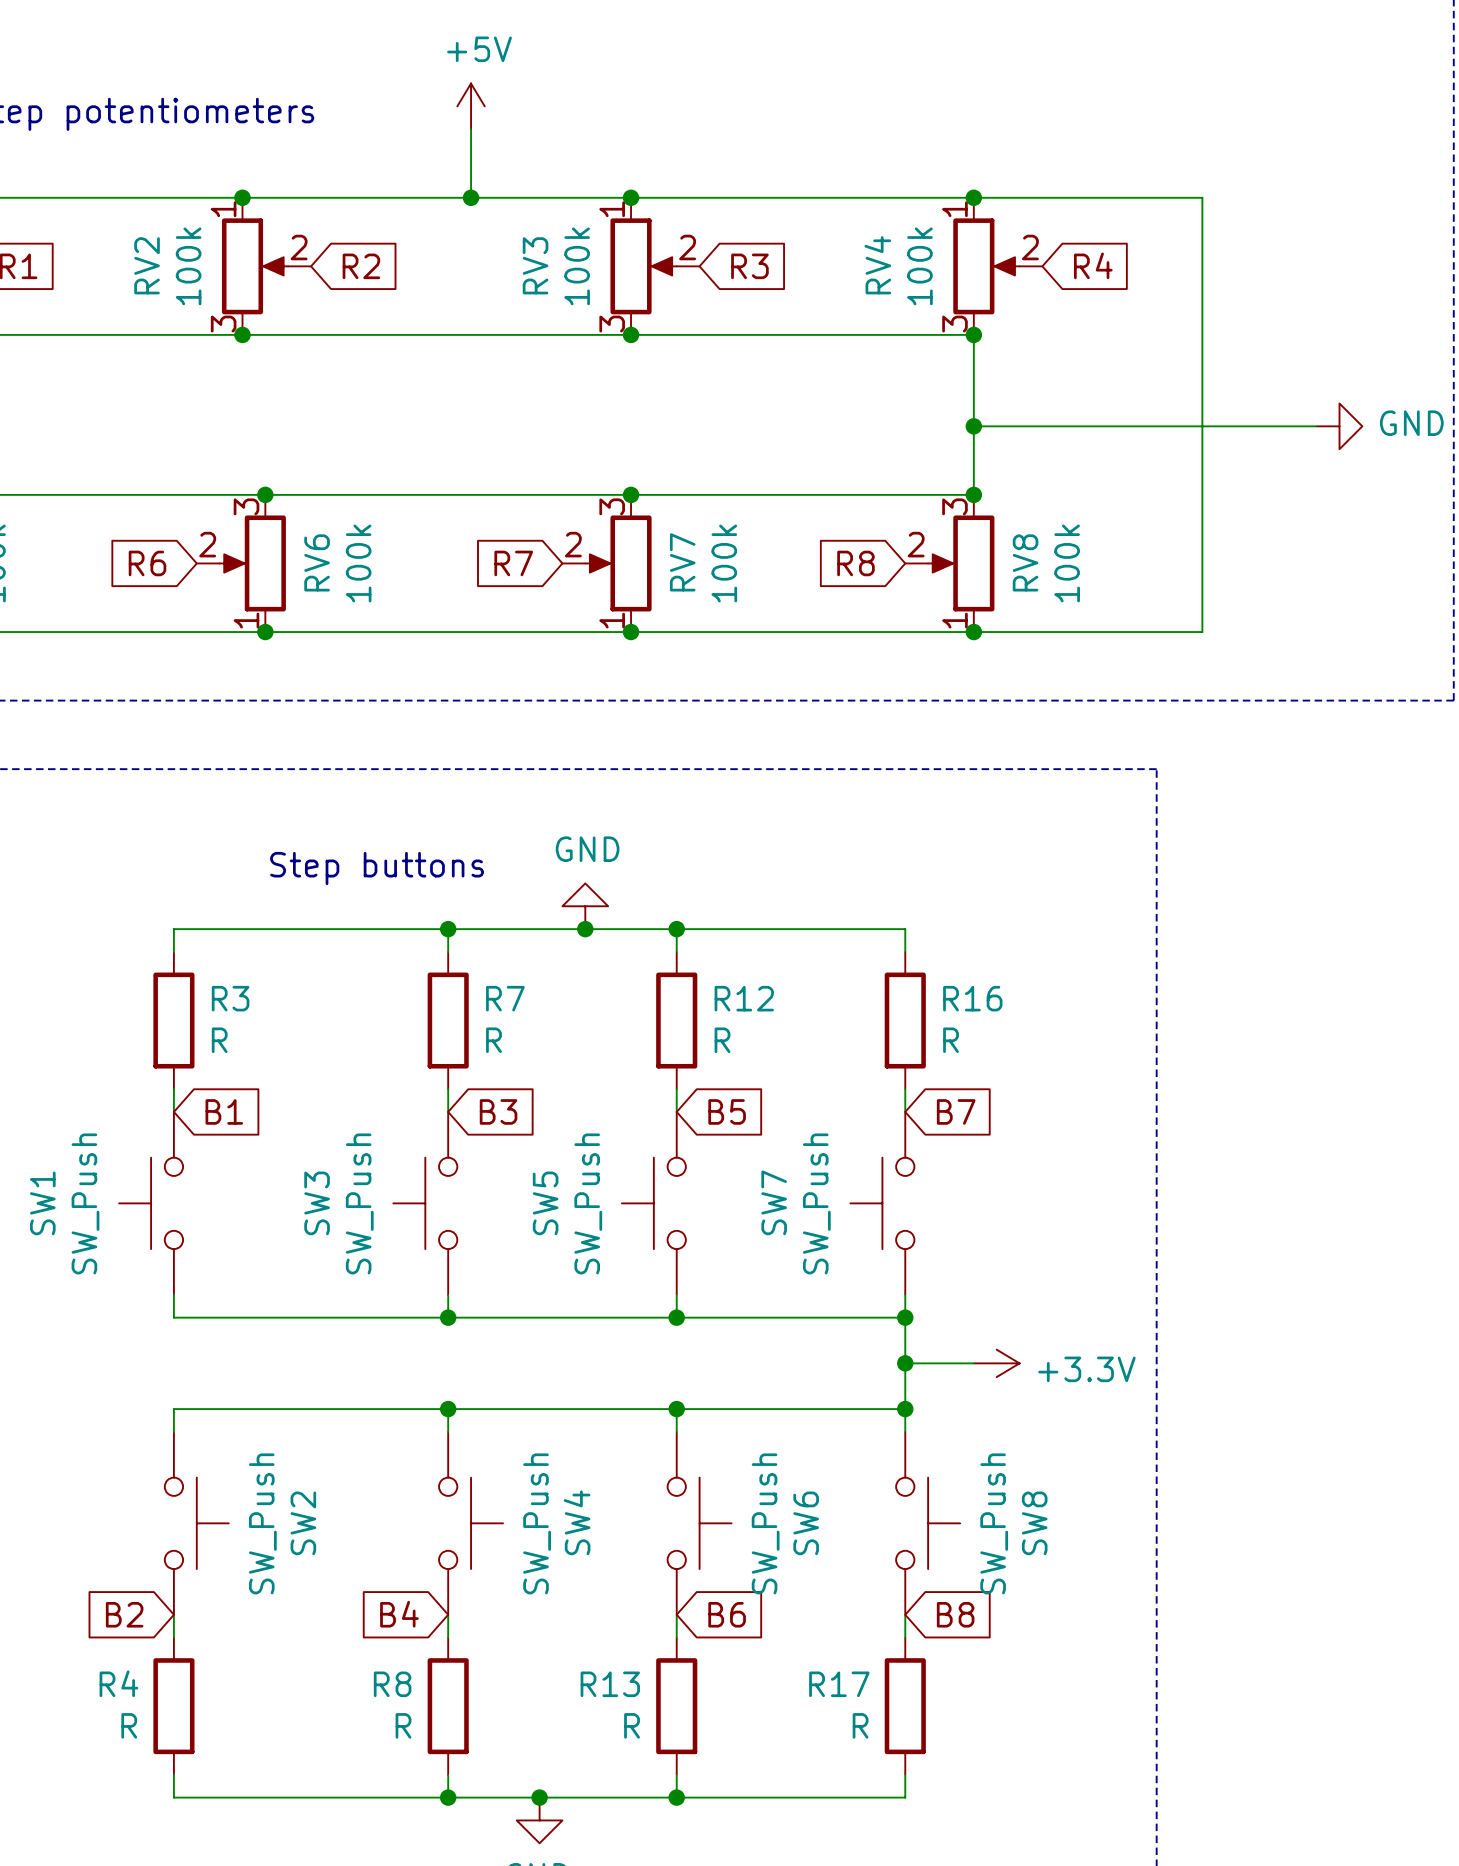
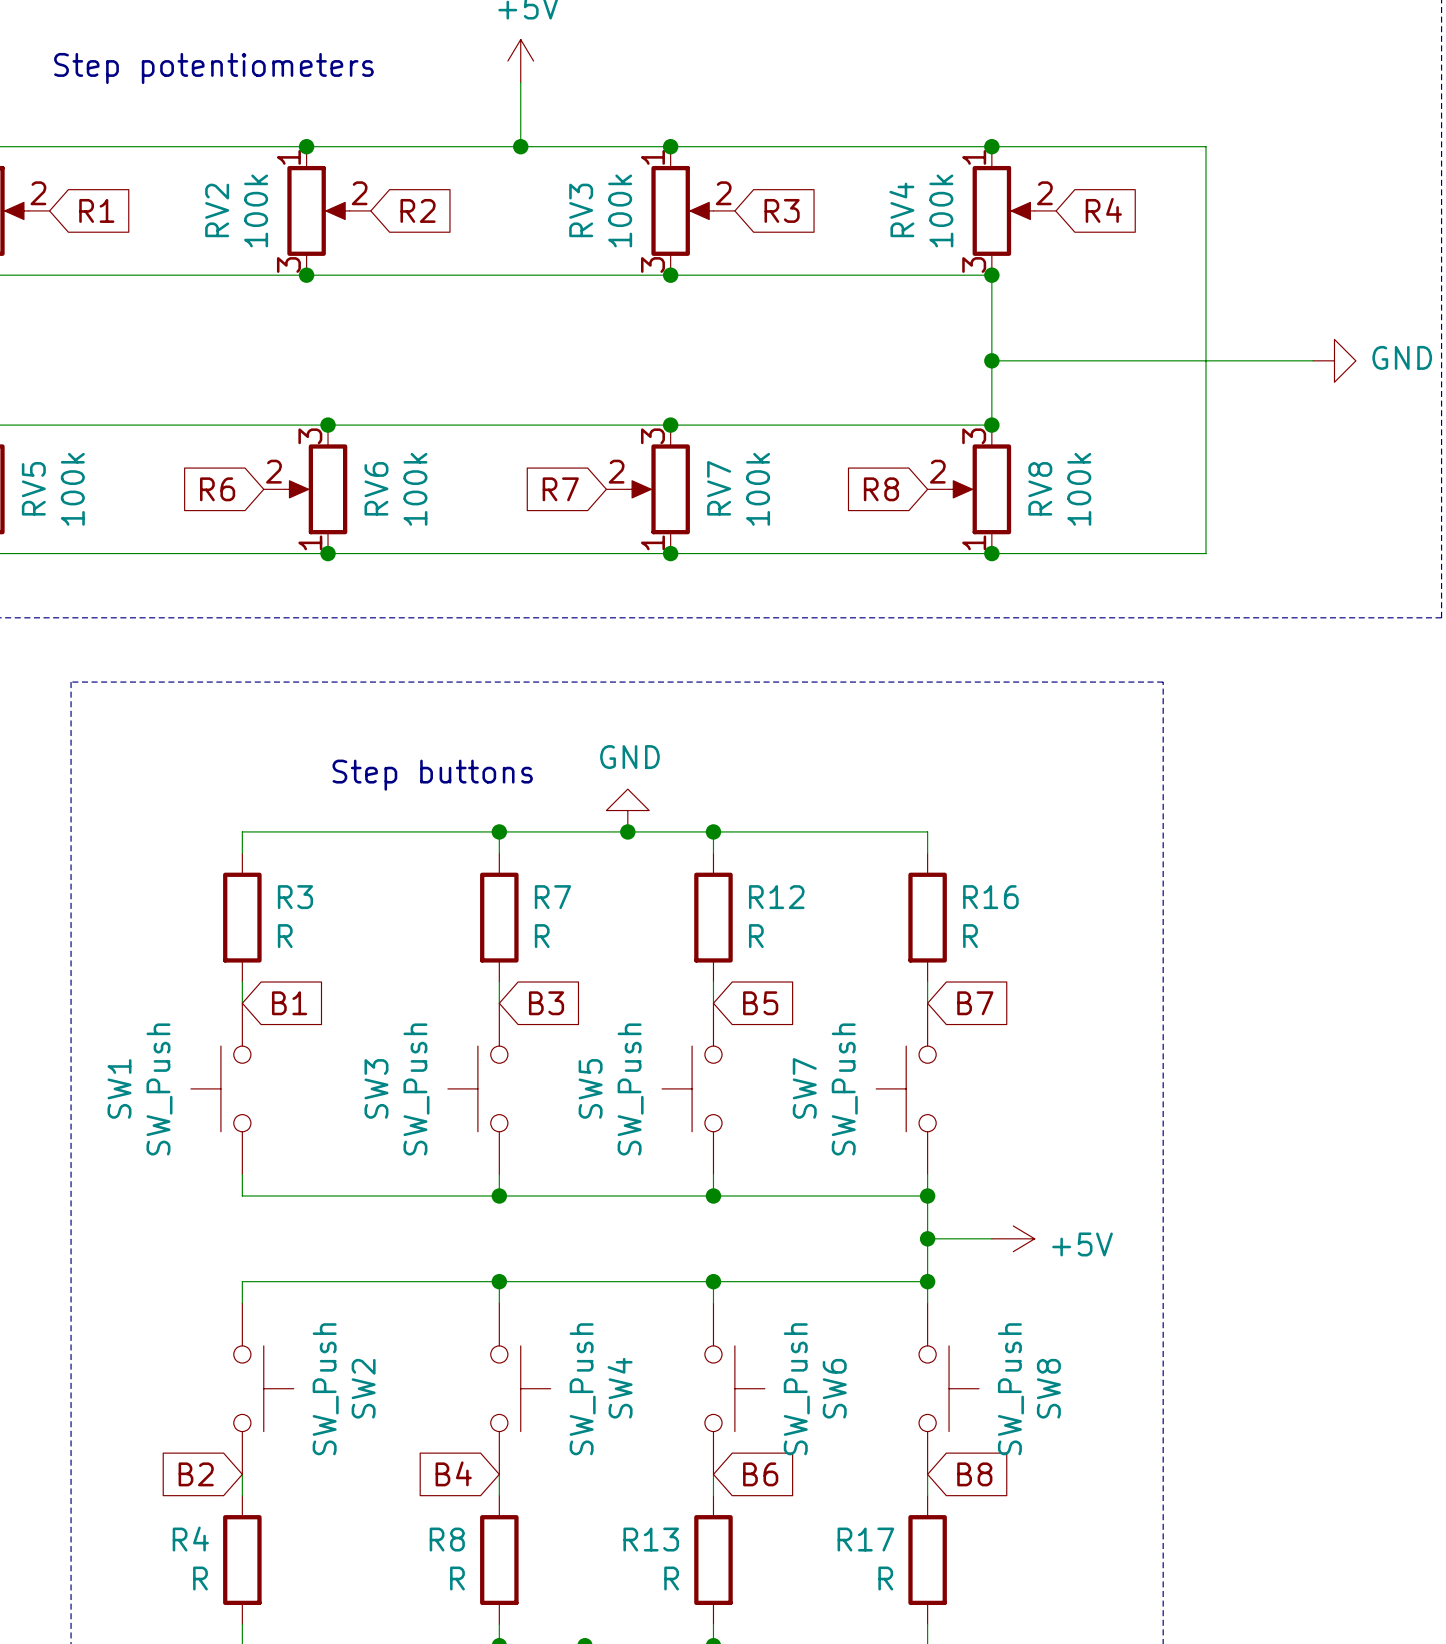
power symbol: +3.3V (996, 1363) -> +5V (1013, 1238)

